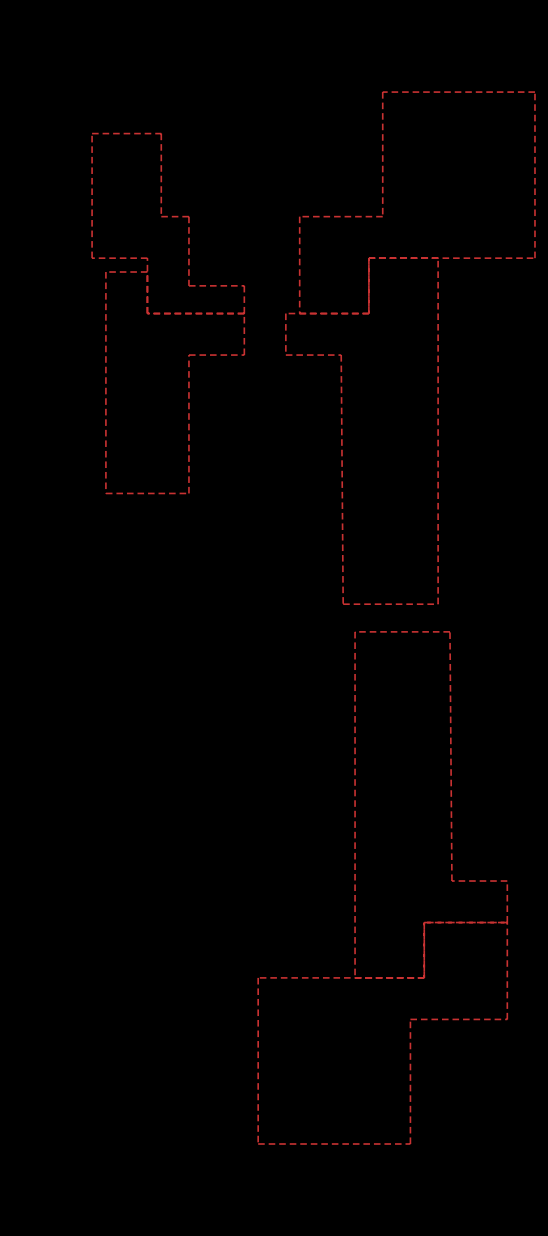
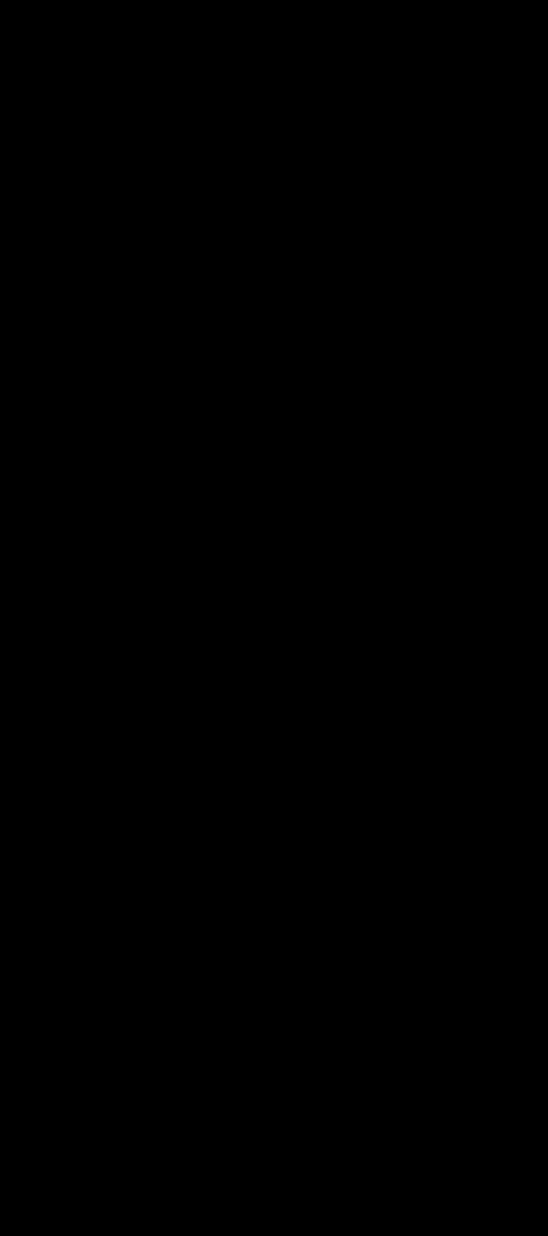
zone outline: (438, 258) (438, 604) (343, 604) (341, 355) (285, 355) (285, 313) (368, 313) (368, 258) (534, 258) (534, 92) (382, 92) (382, 216) (299, 216) (299, 313) -> none
zone outline: (147, 272) (105, 272) (105, 493) (188, 493) (188, 355) (244, 355) (244, 285) (188, 285) (188, 216) (161, 216) (161, 133) (92, 133) (92, 258) (147, 258) (147, 313) (244, 313) -> none
zone outline: (507, 922) (424, 922) (424, 977) (258, 977) (258, 1143) (410, 1143) (410, 1019) (507, 1019) (507, 881) (451, 881) (449, 631) (355, 631) (355, 977) -> none

